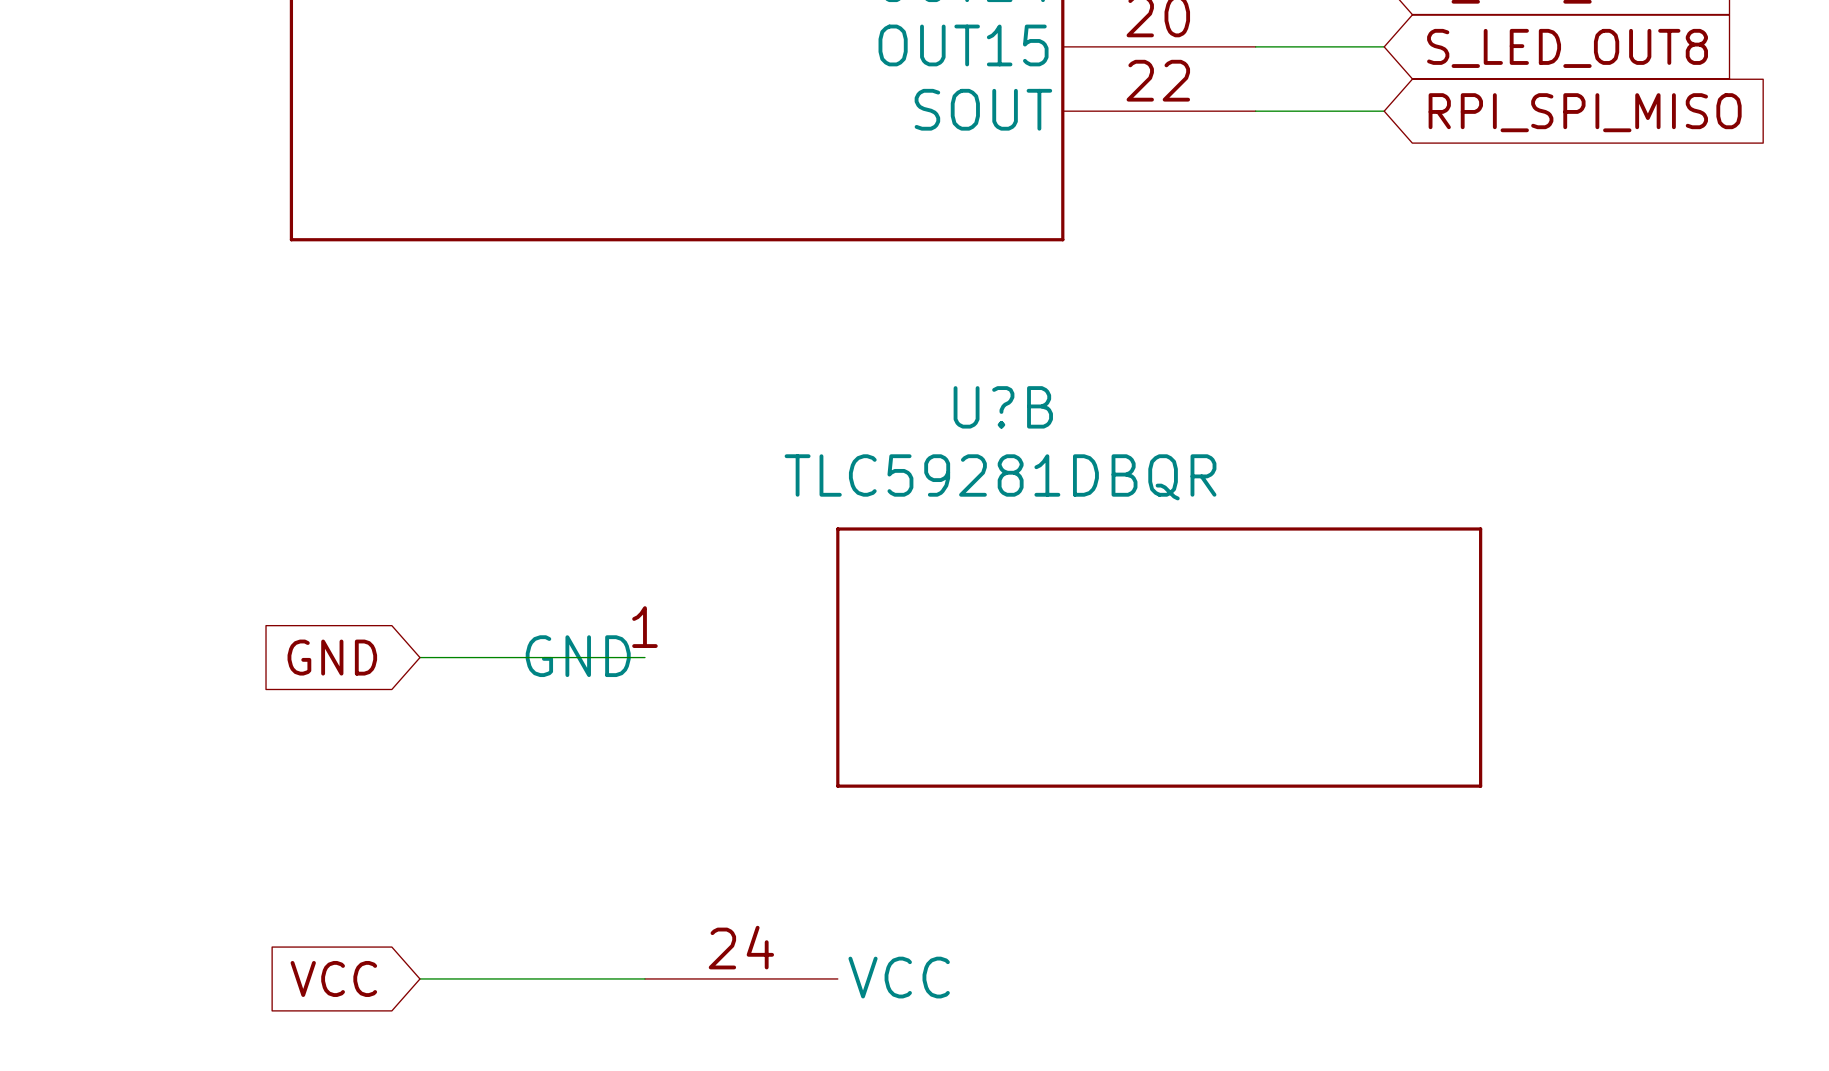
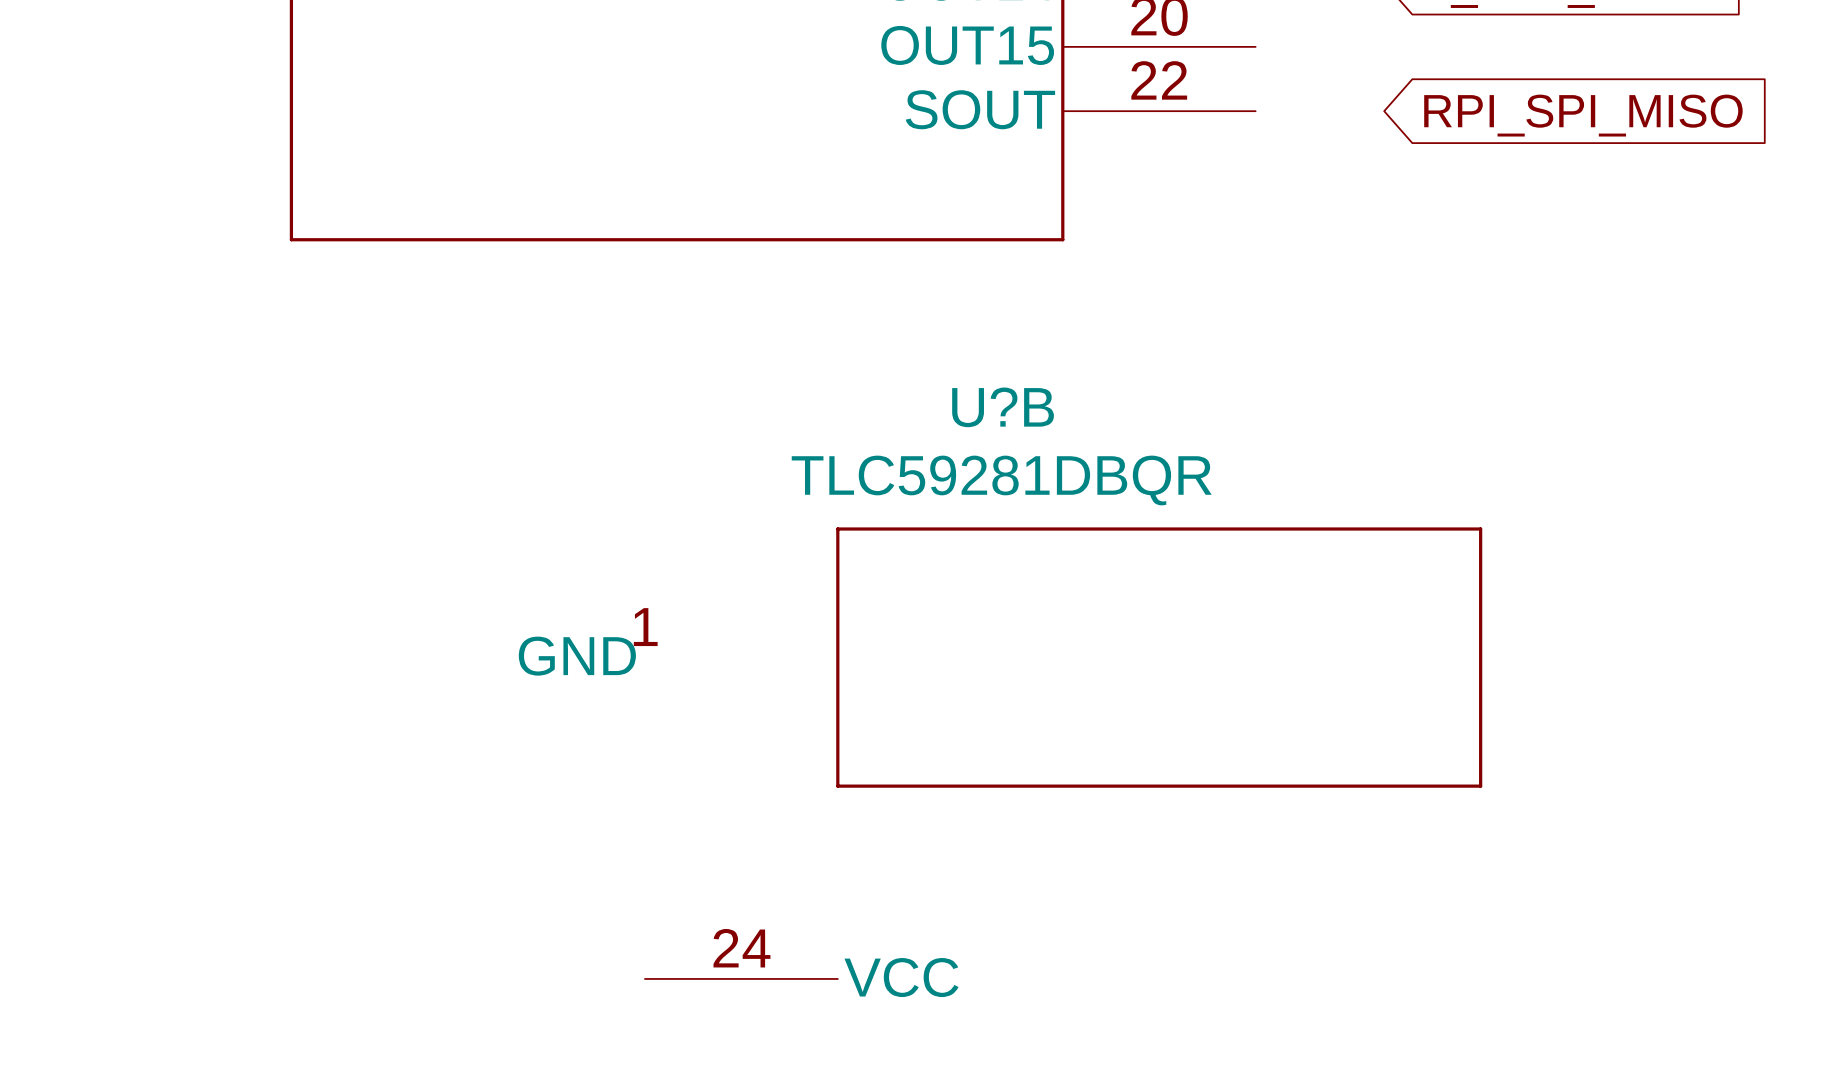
wire: (1255, 46) (1384, 46) -> none
global label: S_LED_OUT8 (1567, 48) -> none
wire: (1255, 111) (1384, 111) -> none
global label: GND (332, 657) -> none
wire: (419, 657) (644, 657) -> none
global label: VCC (333, 978) -> none
wire: (419, 978) (644, 978) -> none

